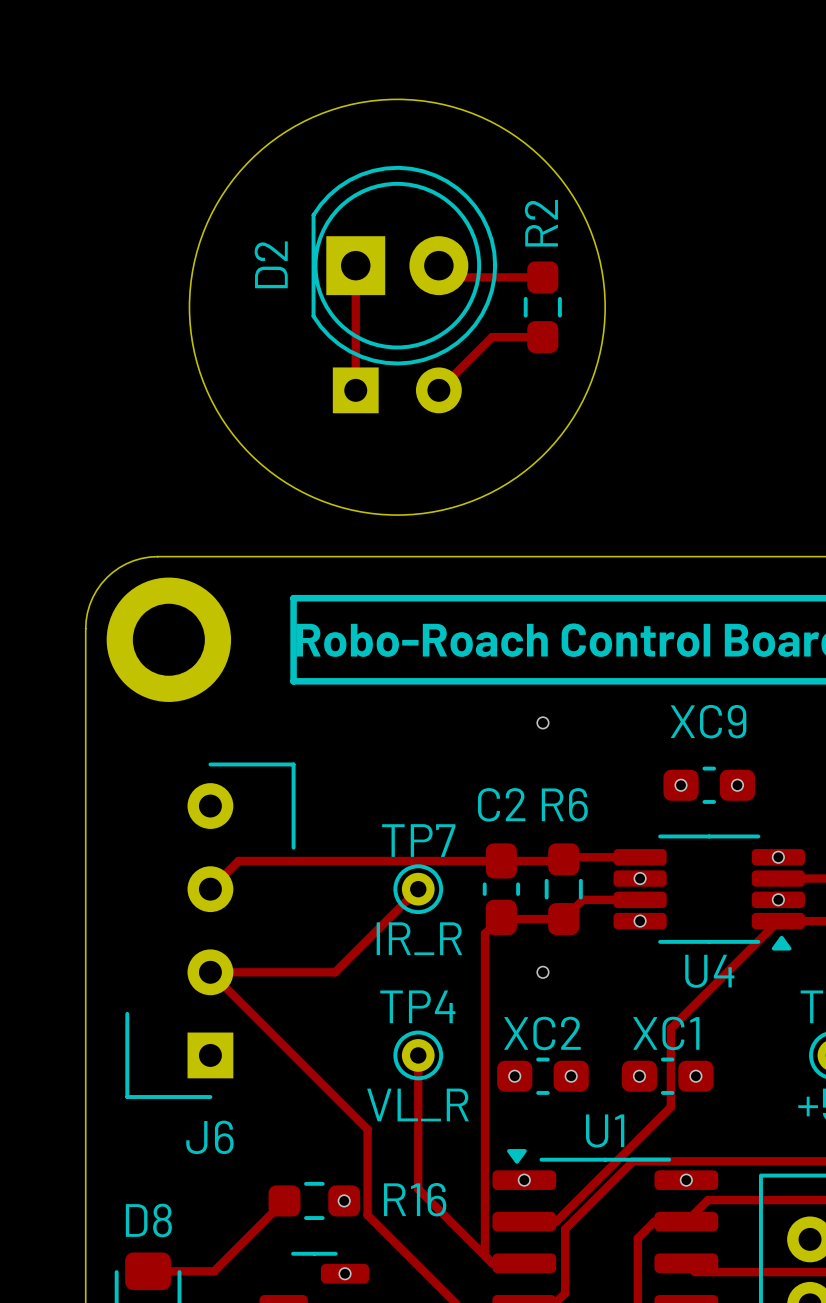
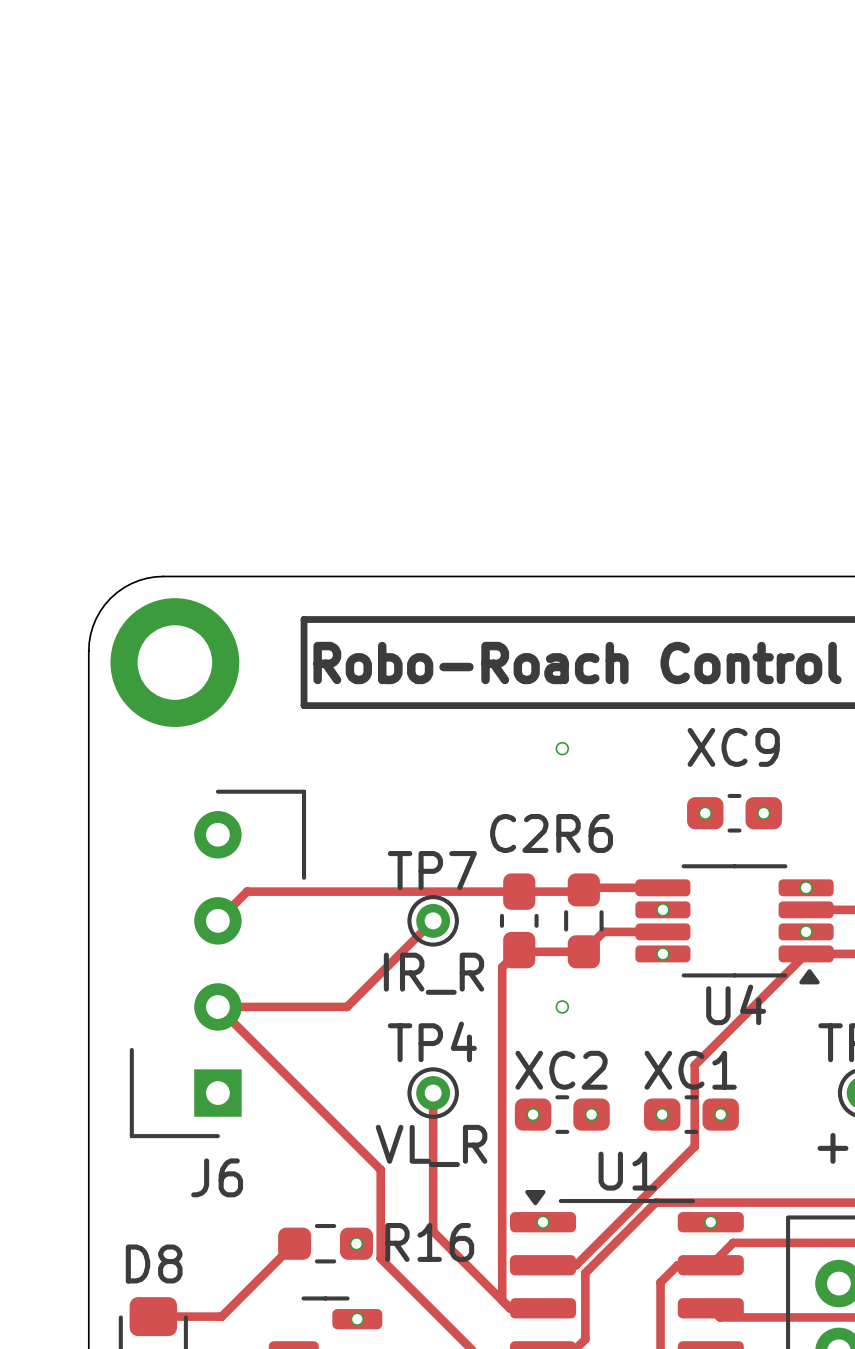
round board edge: [188, 98, 606, 516] -> none
track: (355, 265) (355, 390) -> none
D2: (404, 265) -> none
track: (438, 265) (450, 277) (542, 277) -> none
R2: (542, 307) -> none
track: (542, 337) (492, 337) (438, 390) -> none
part: (397, 390) -> none

